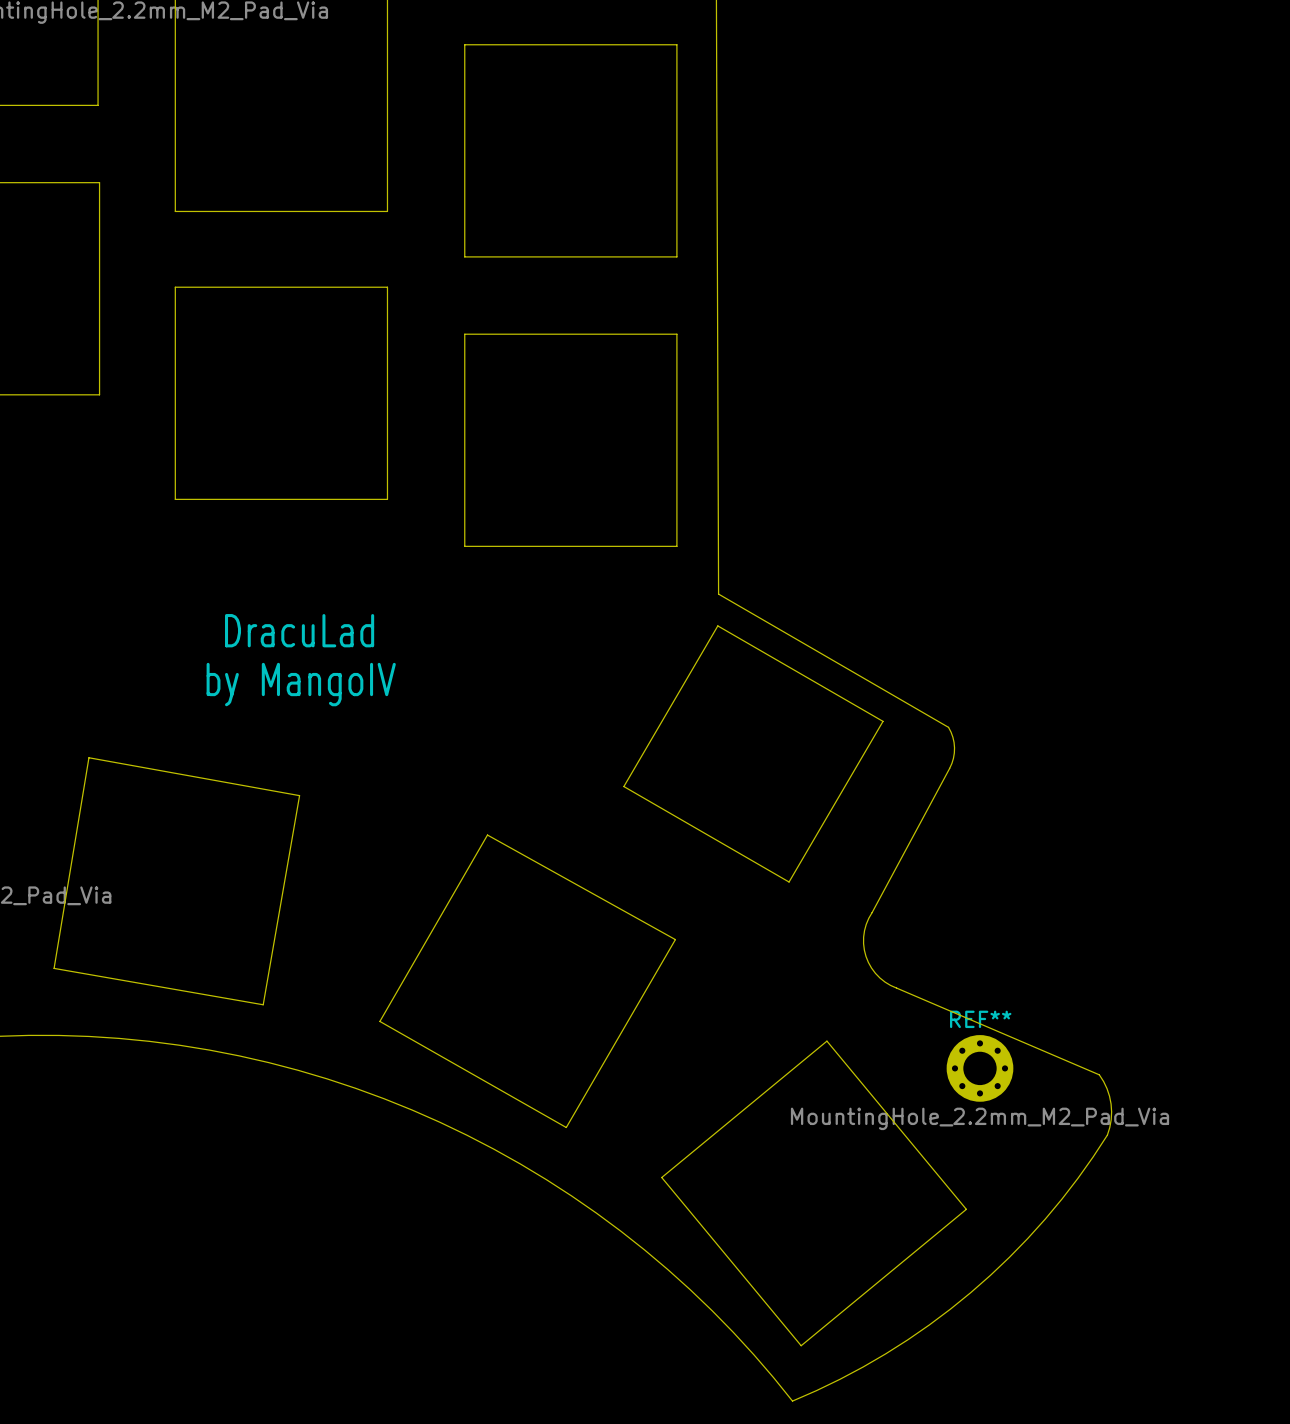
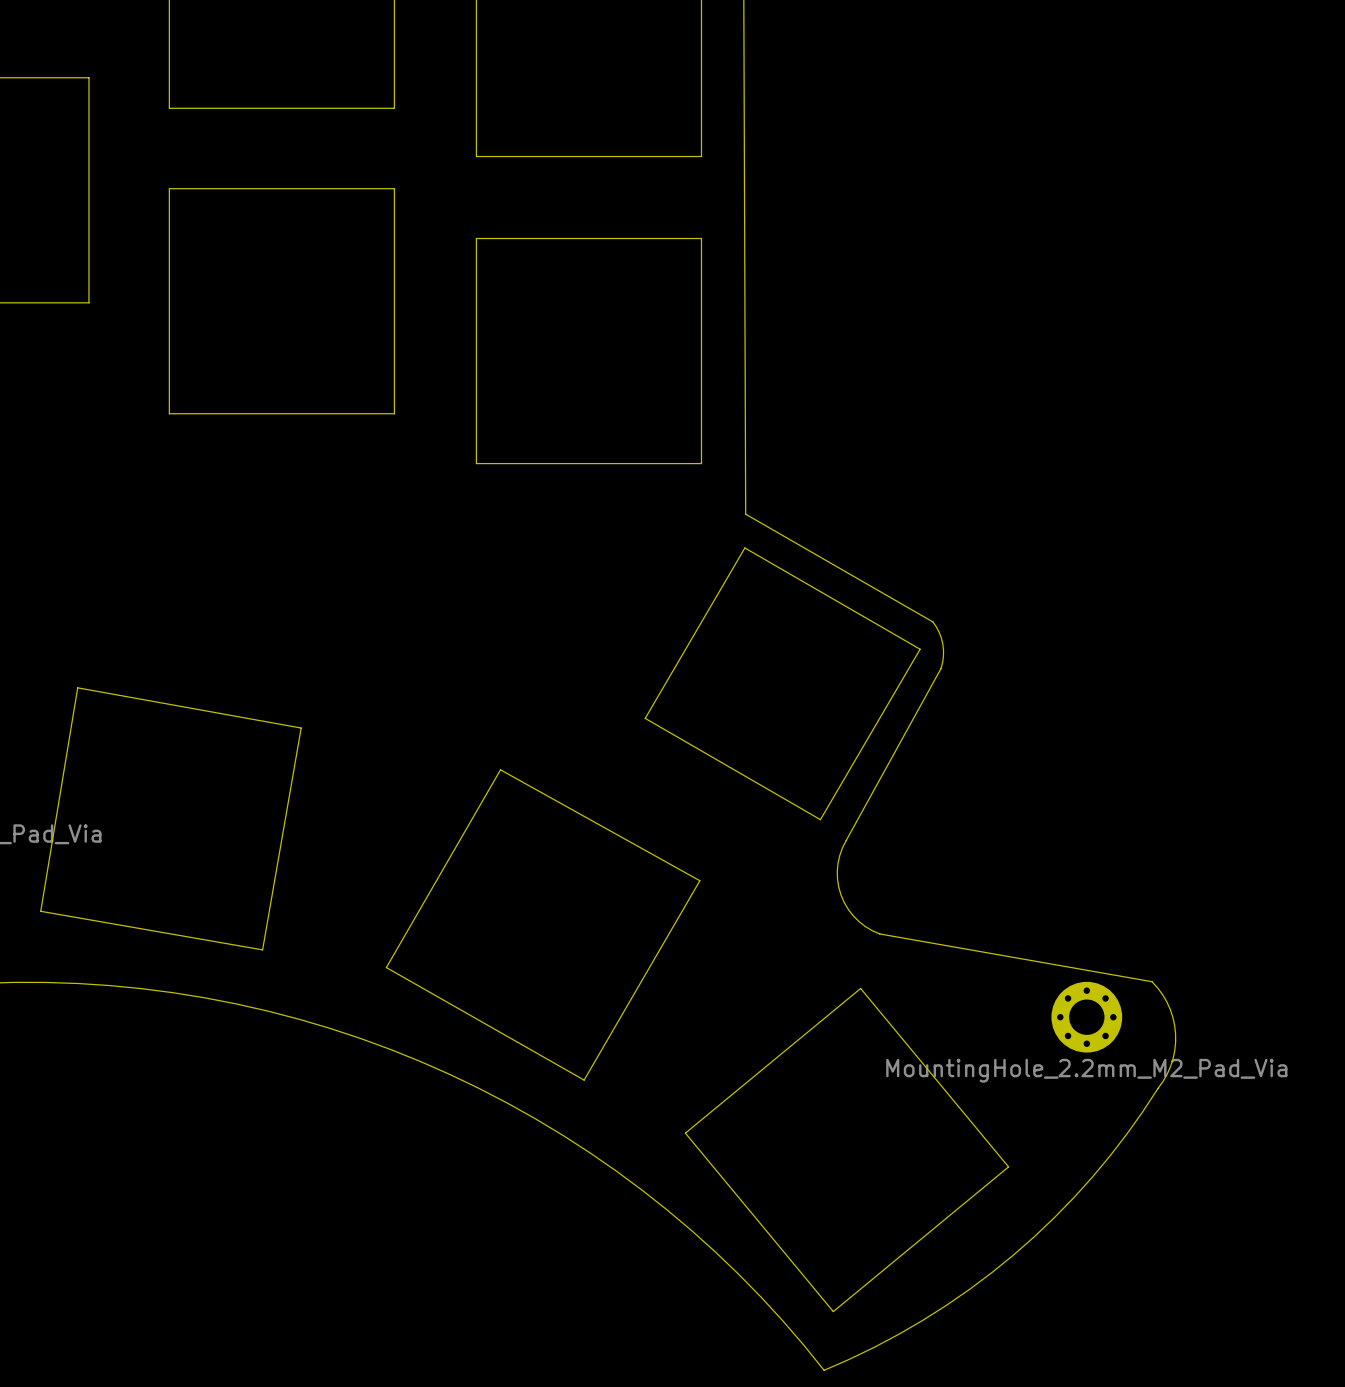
board edge: (718, 594) (948, 727) (954, 747) (951, 763) (868, 918) (863, 937) (865, 956) (875, 973) (890, 985) (1099, 1074) (1107, 1088) (1111, 1103) (1111, 1119) (1107, 1135) -> (745, 514) (932, 621) (941, 638) (943, 656) (941, 668) (839, 855) (837, 879) (841, 895) (848, 909) (865, 926) (879, 933) (1151, 981) (1166, 1001) (1172, 1017) (1175, 1033) (1173, 1058) (1167, 1074) (1158, 1088)
text: DracuLad (299, 630) -> none
text: by MangoIV (301, 684) -> none
REF**: MountingHole_2.2mm_M2_Pad_Via (979, 1068) -> none
part: none -> MountingHole_2.2mm_M2_Pad_Via (1086, 1017)

